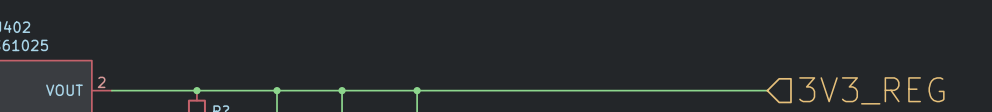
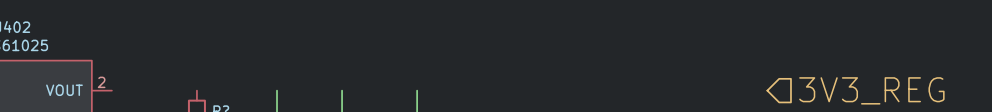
wire: (111, 90) (767, 90) -> none
junction: (196, 90) -> none
junction: (277, 90) -> none
junction: (342, 90) -> none
junction: (417, 90) -> none

